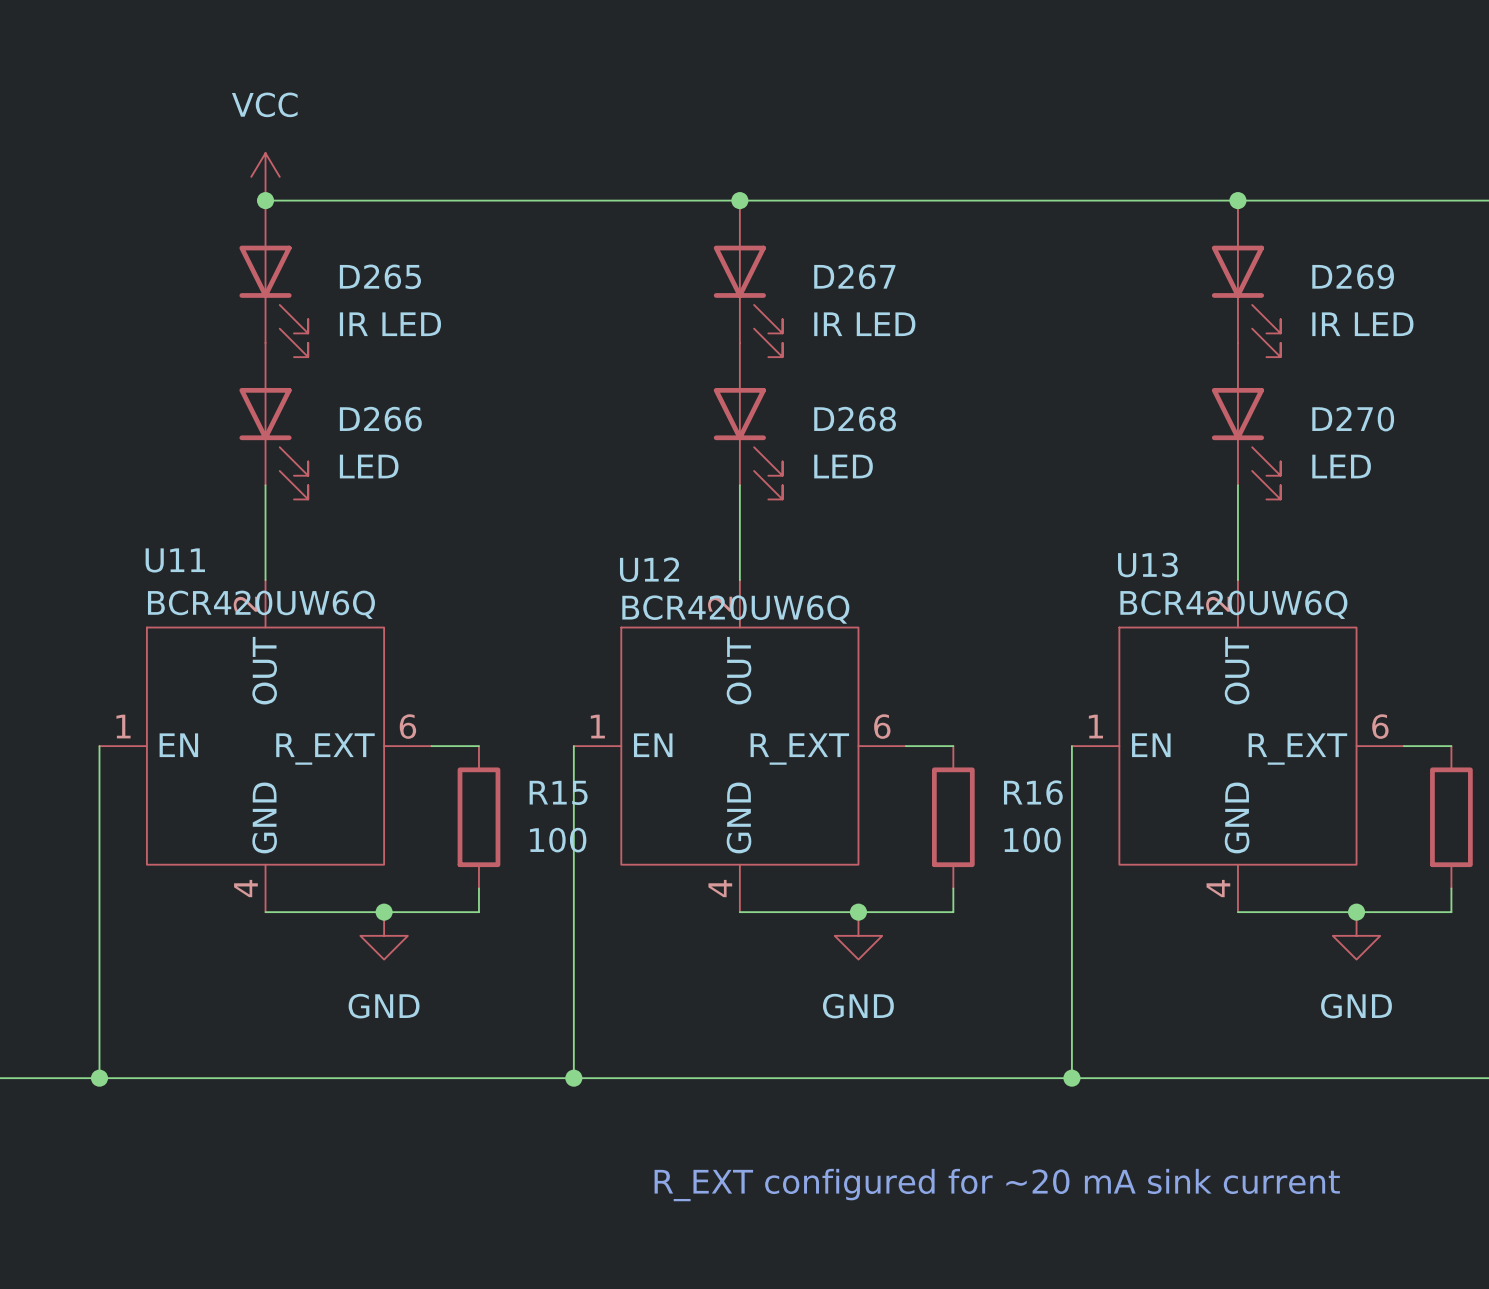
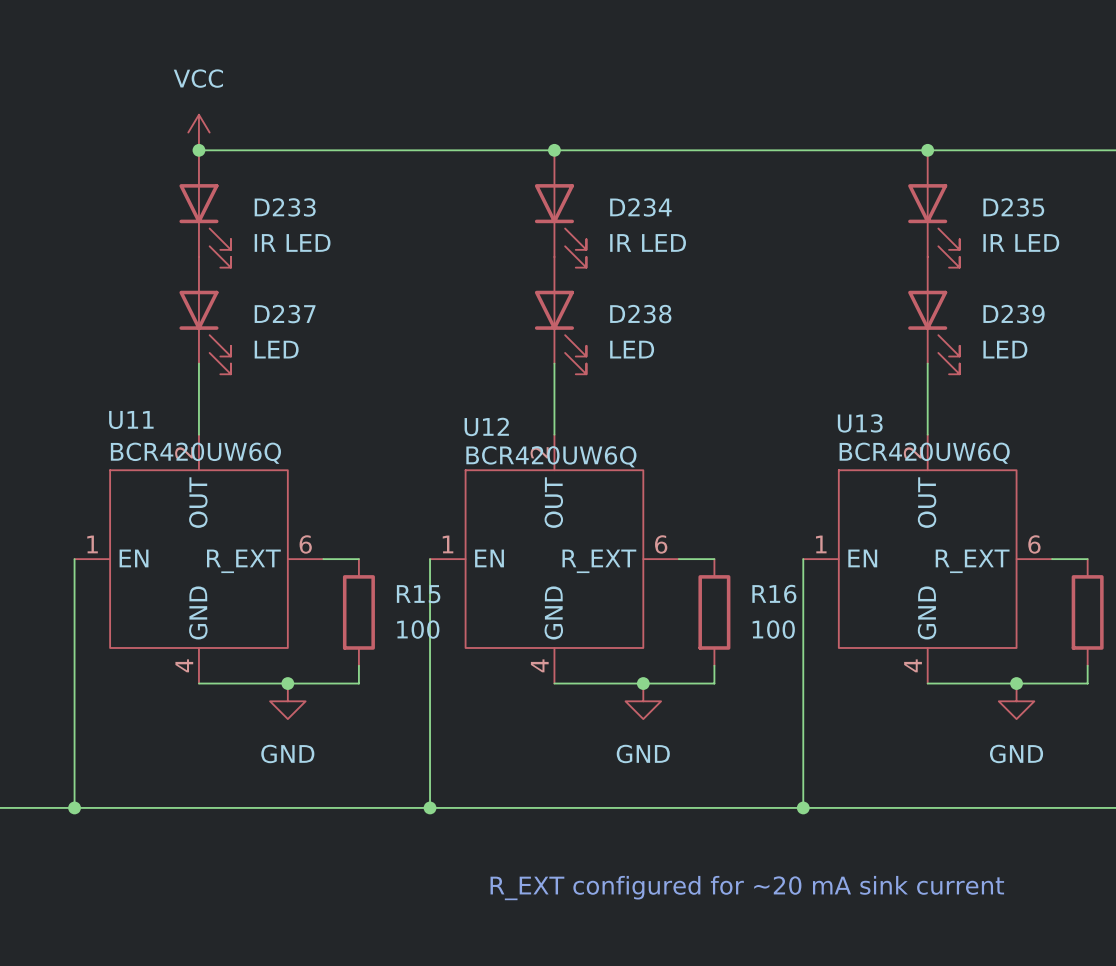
D265 name: D265 (380, 276) -> D233 (285, 207)
D267 name: D267 (854, 276) -> D234 (640, 207)
D269 name: D269 (1353, 276) -> D235 (1013, 207)
D266 name: D266 (380, 419) -> D237 (285, 314)
D268 name: D268 (855, 419) -> D238 (640, 314)
D270 name: D270 (1353, 419) -> D239 (1014, 314)

